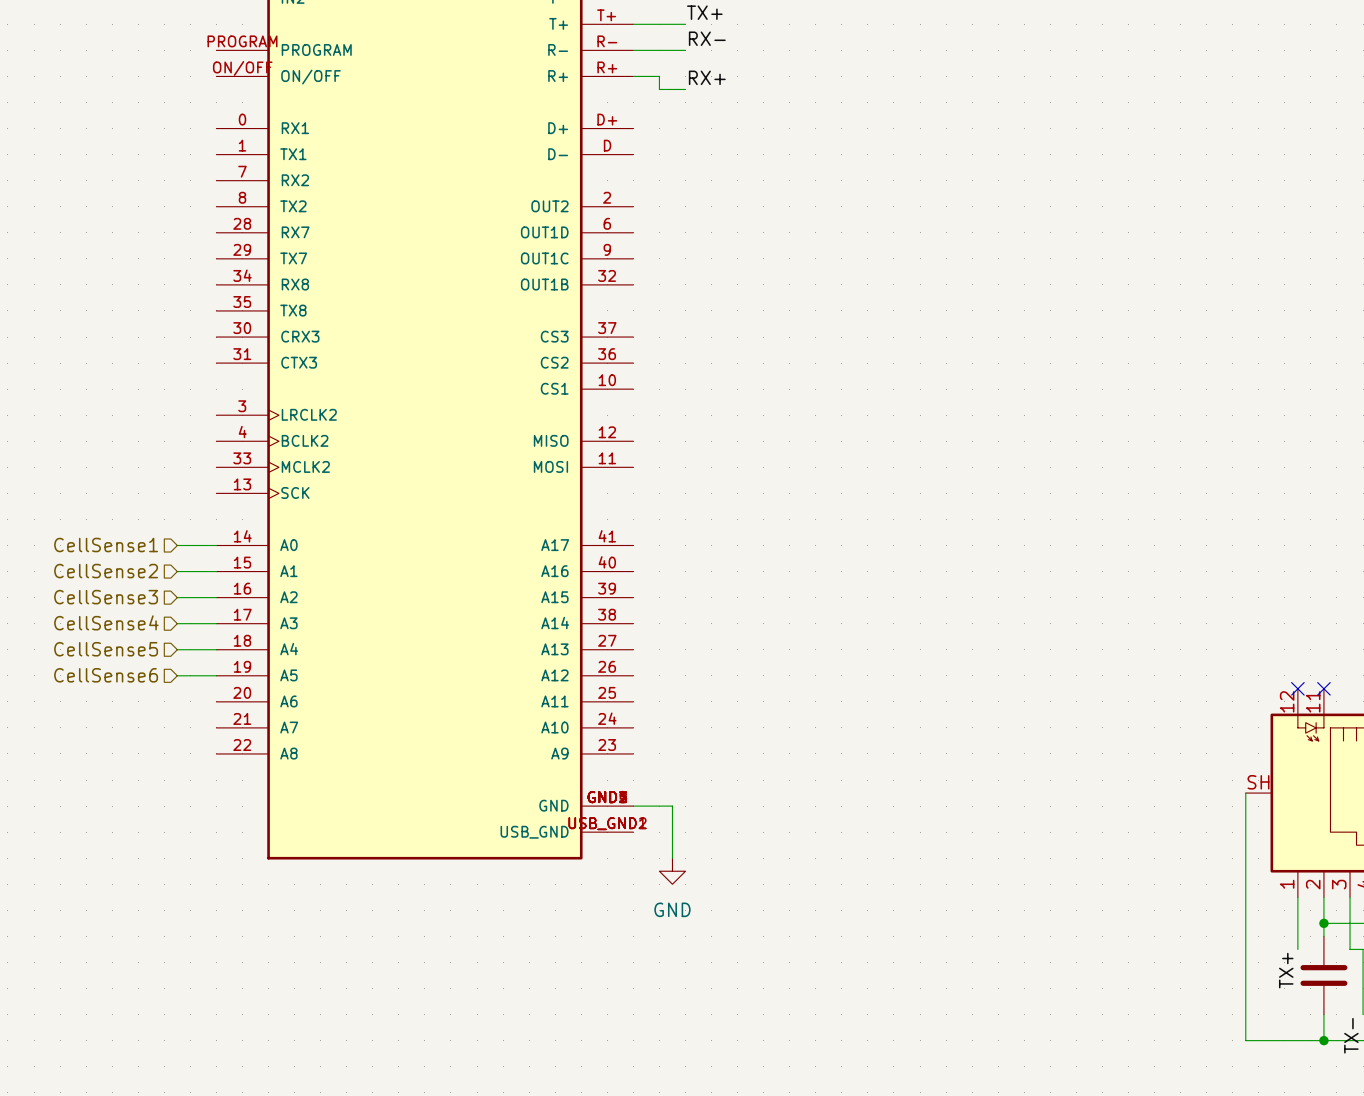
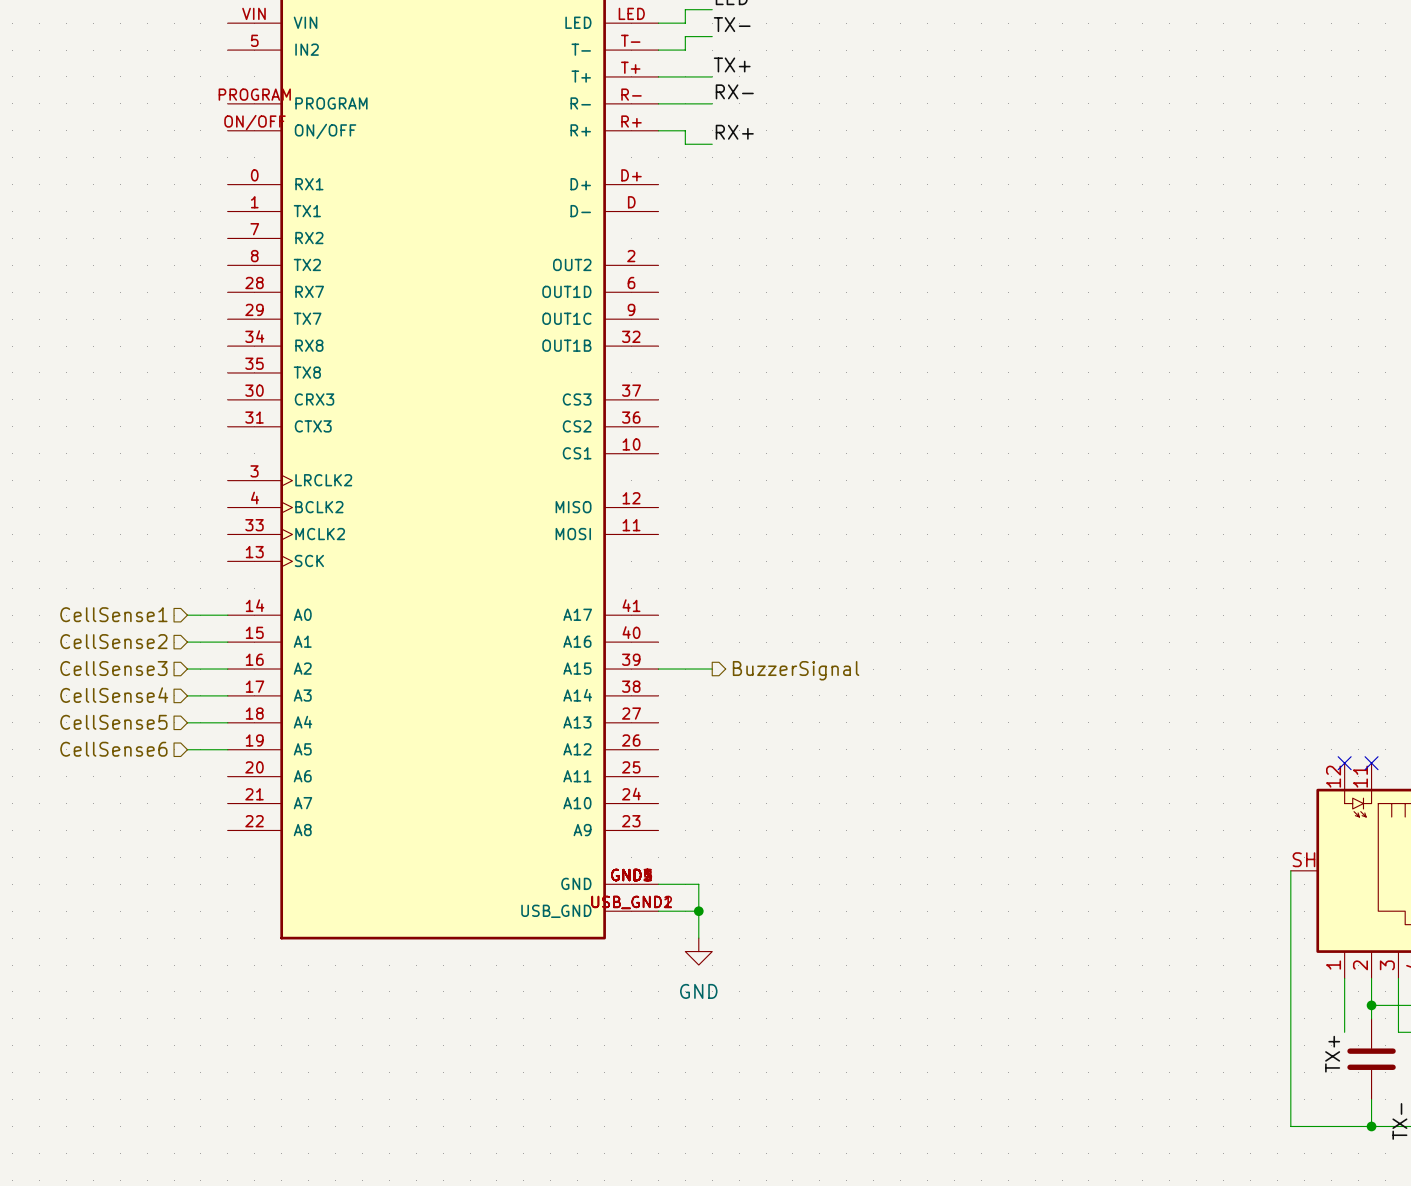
wire: none -> (658, 669) (712, 669)
hierarchical label: none -> BuzzerSignal (796, 670)
wire: none -> (658, 911) (698, 911)
junction: none -> (698, 911)

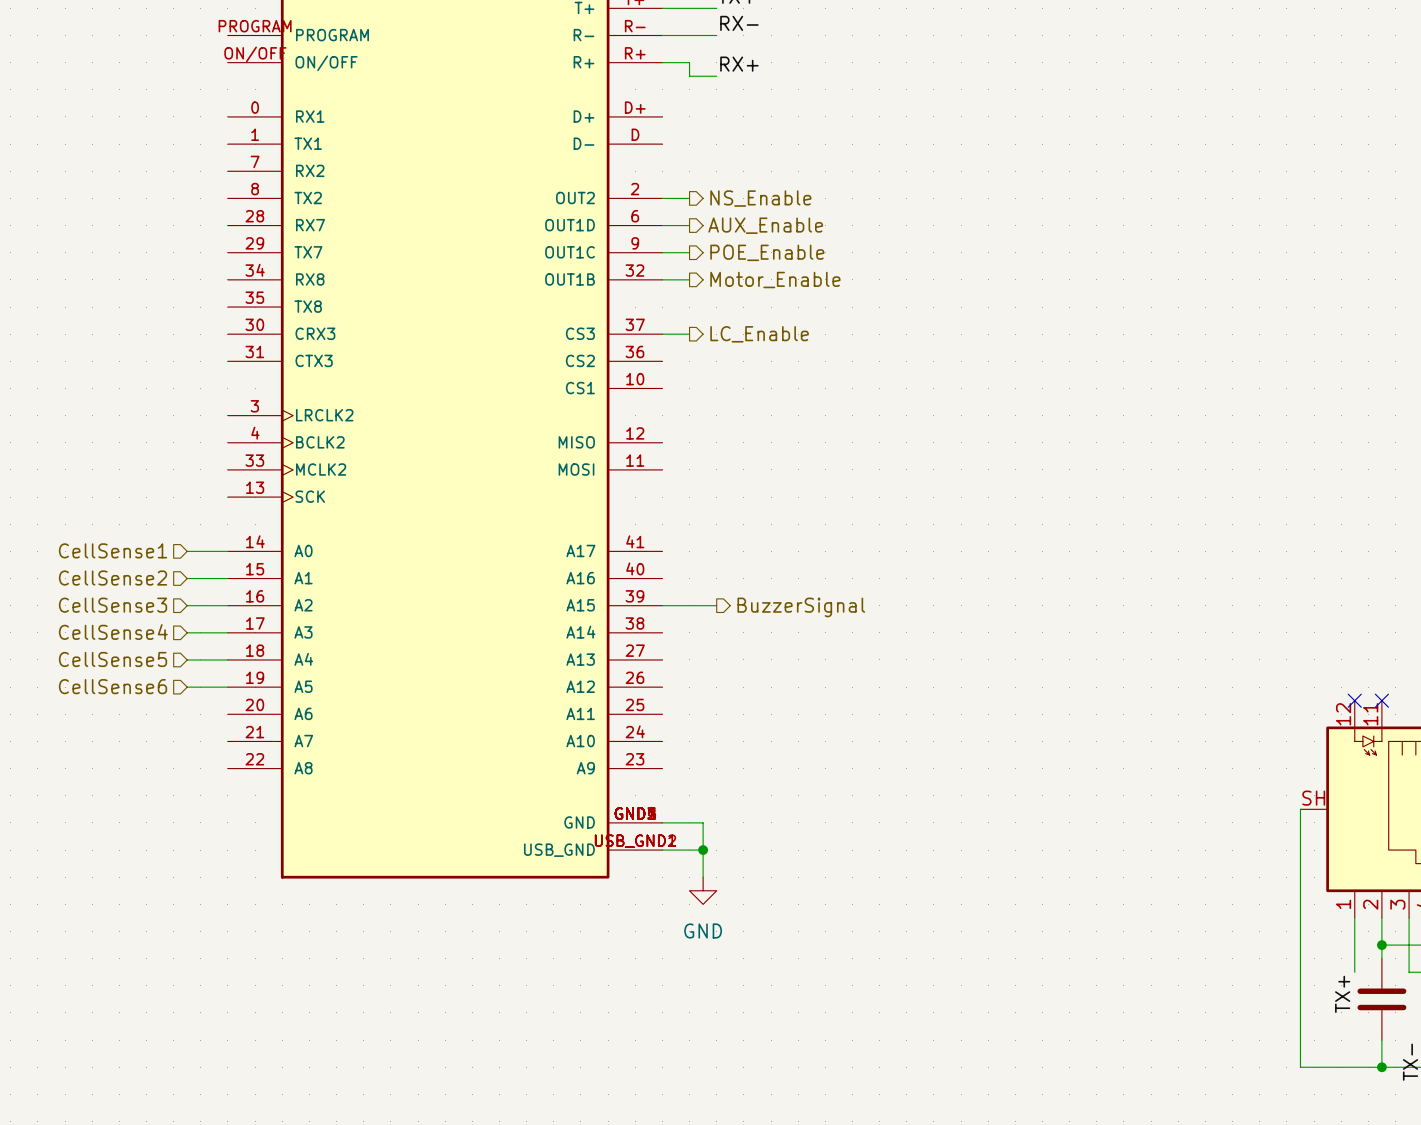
wire: none -> (662, 198) (689, 198)
hierarchical label: none -> NS_Enable (760, 198)
wire: none -> (662, 225) (689, 225)
hierarchical label: none -> AUX_Enable (765, 225)
wire: none -> (662, 252) (689, 252)
hierarchical label: none -> POE_Enable (767, 252)
wire: none -> (662, 279) (689, 279)
hierarchical label: none -> Motor_Enable (775, 280)
wire: none -> (662, 334) (689, 334)
hierarchical label: none -> LC_Enable (759, 334)

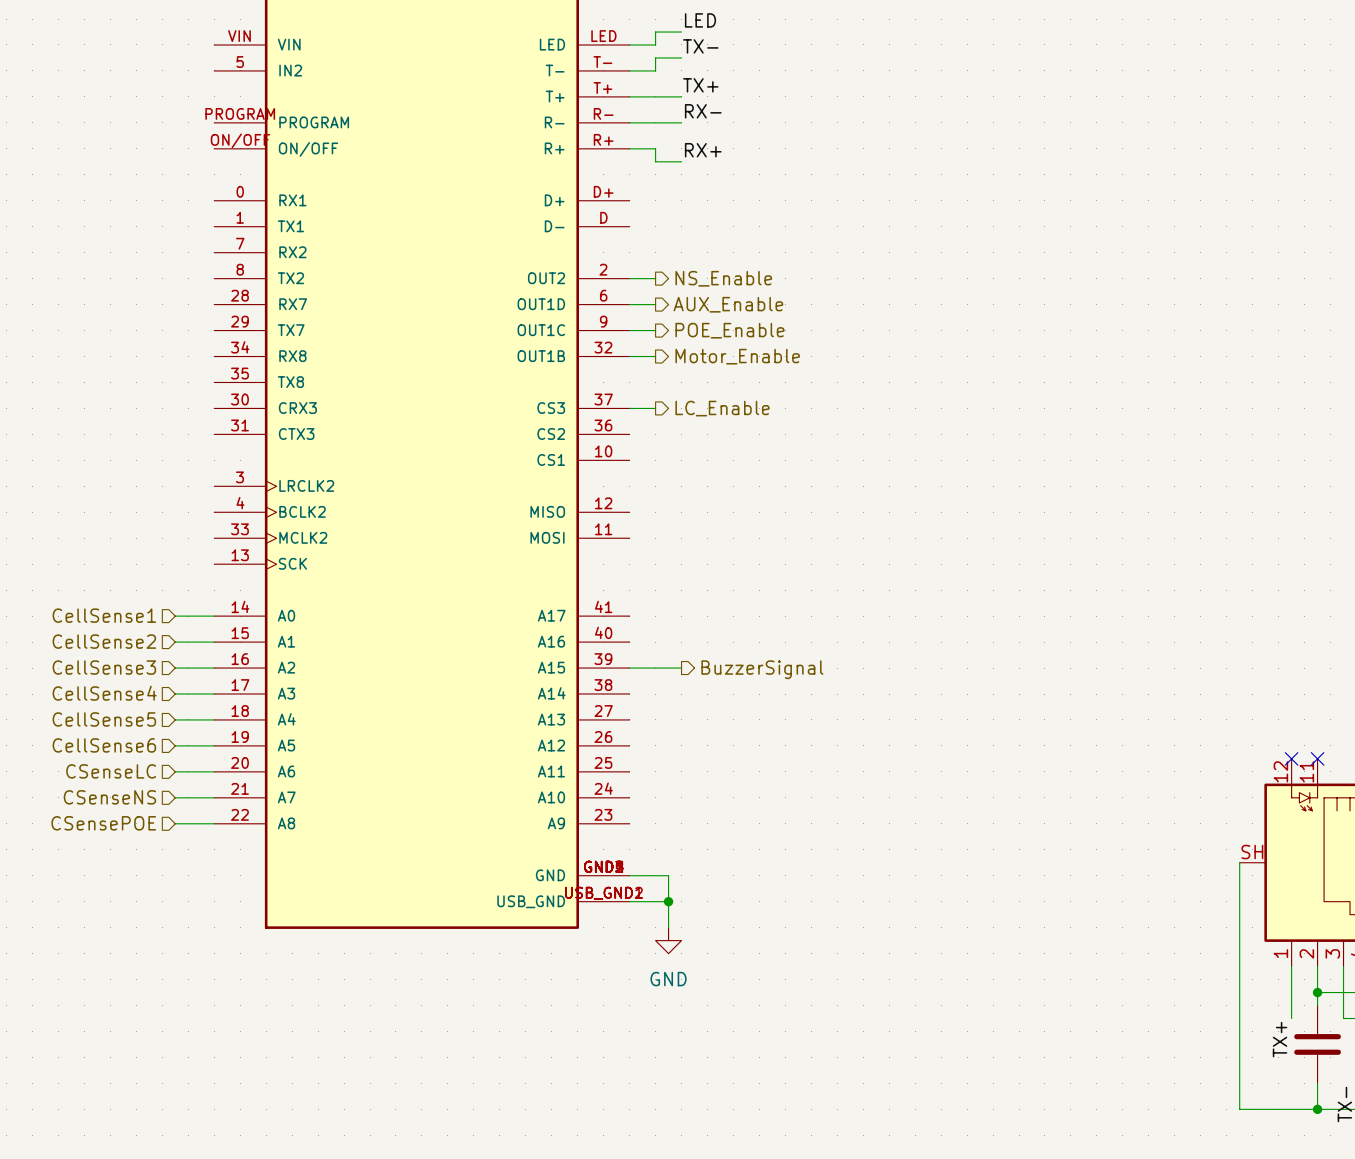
hierarchical label: none -> CSenseLC (111, 771)
wire: none -> (175, 771) (214, 771)
hierarchical label: none -> CSenseNS (109, 797)
wire: none -> (175, 797) (214, 797)
hierarchical label: none -> CSensePOE (103, 823)
wire: none -> (175, 823) (214, 823)

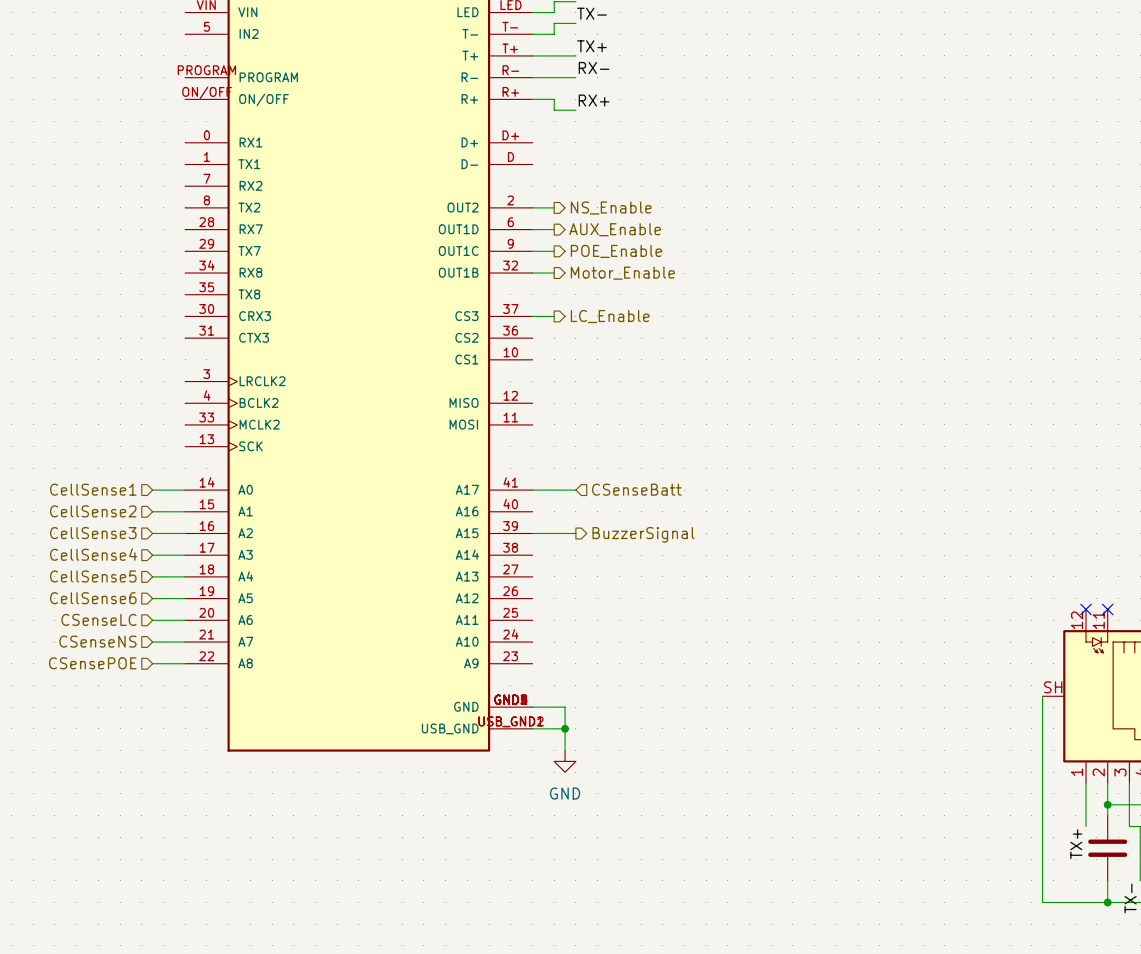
hierarchical label: none -> CSenseBatt (636, 489)
wire: none -> (532, 490) (575, 490)

